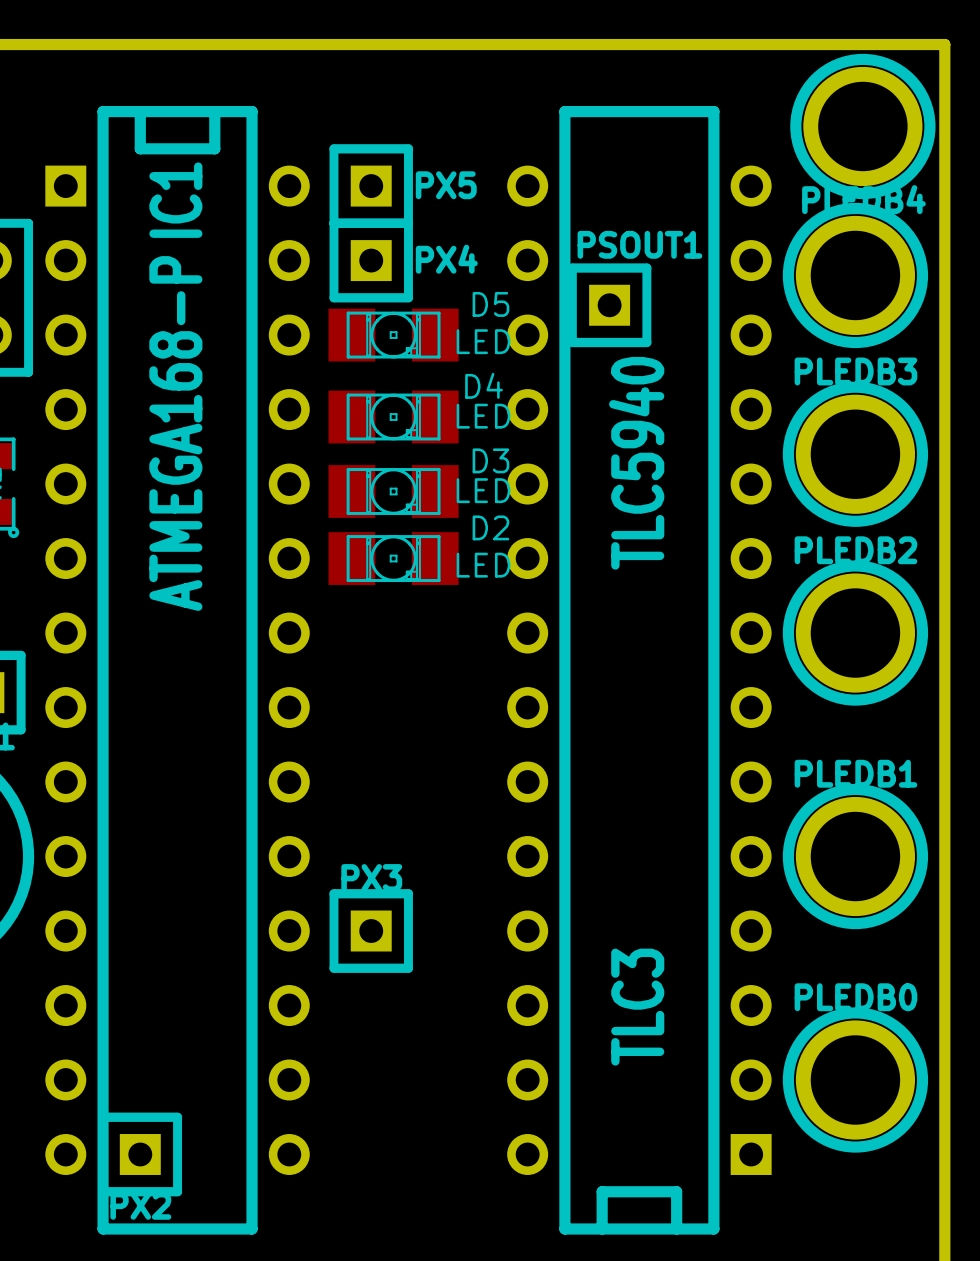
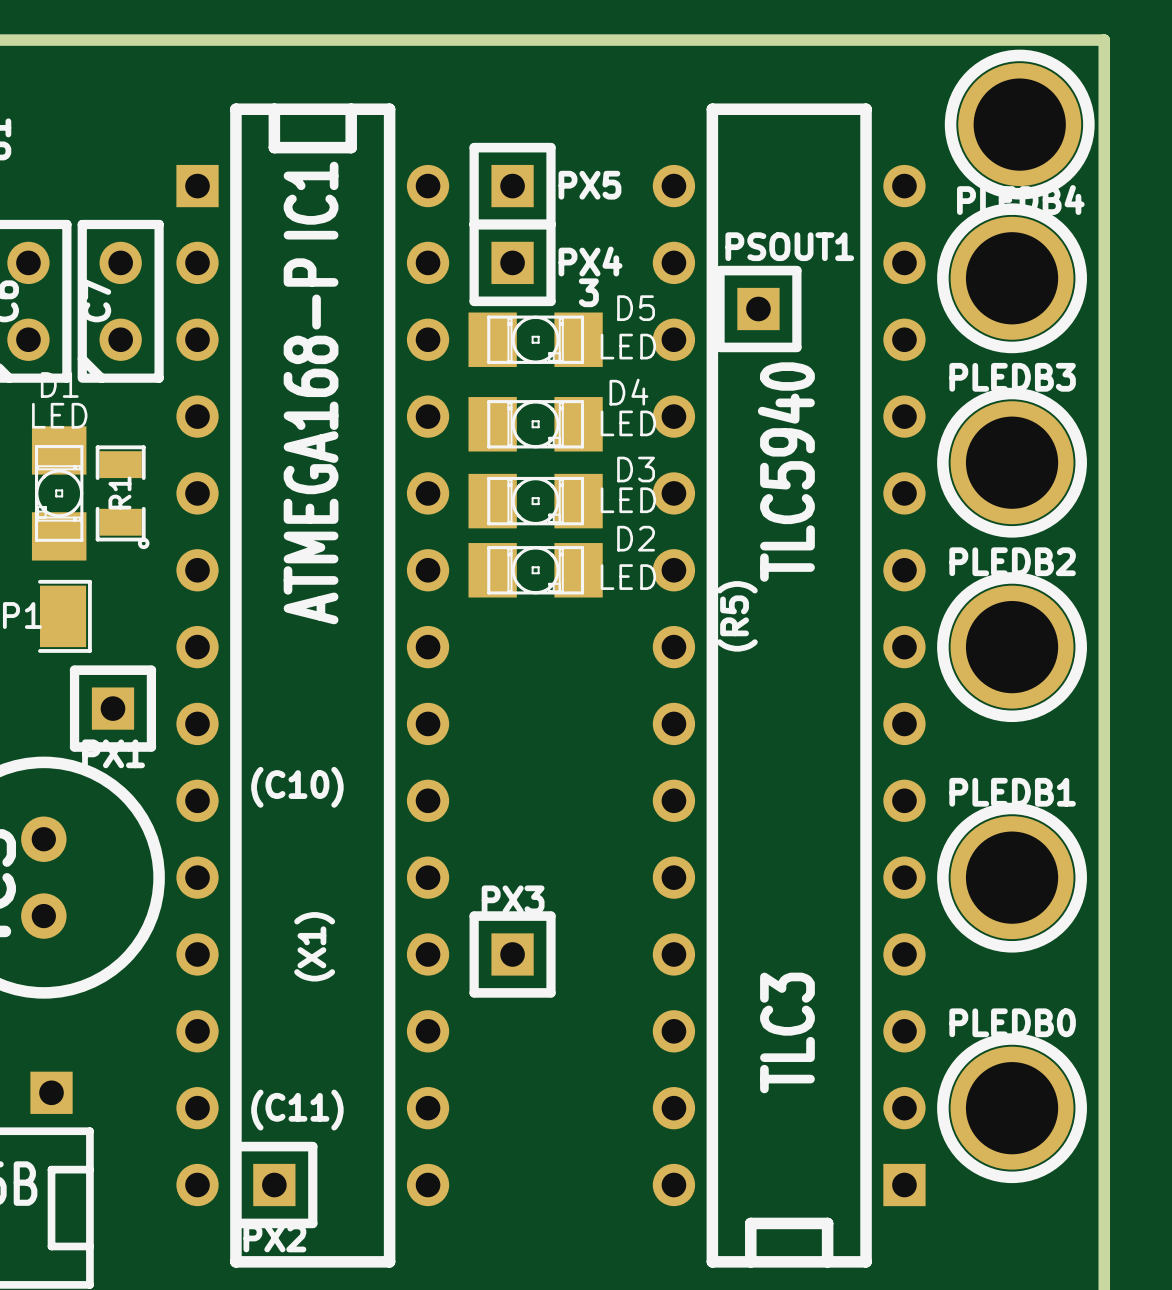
text: none -> 3 (588, 292)
text: none -> (R5) (737, 616)
text: none -> (C10) (297, 787)
text: none -> (X1) (314, 946)
text: none -> (C11) (297, 1110)

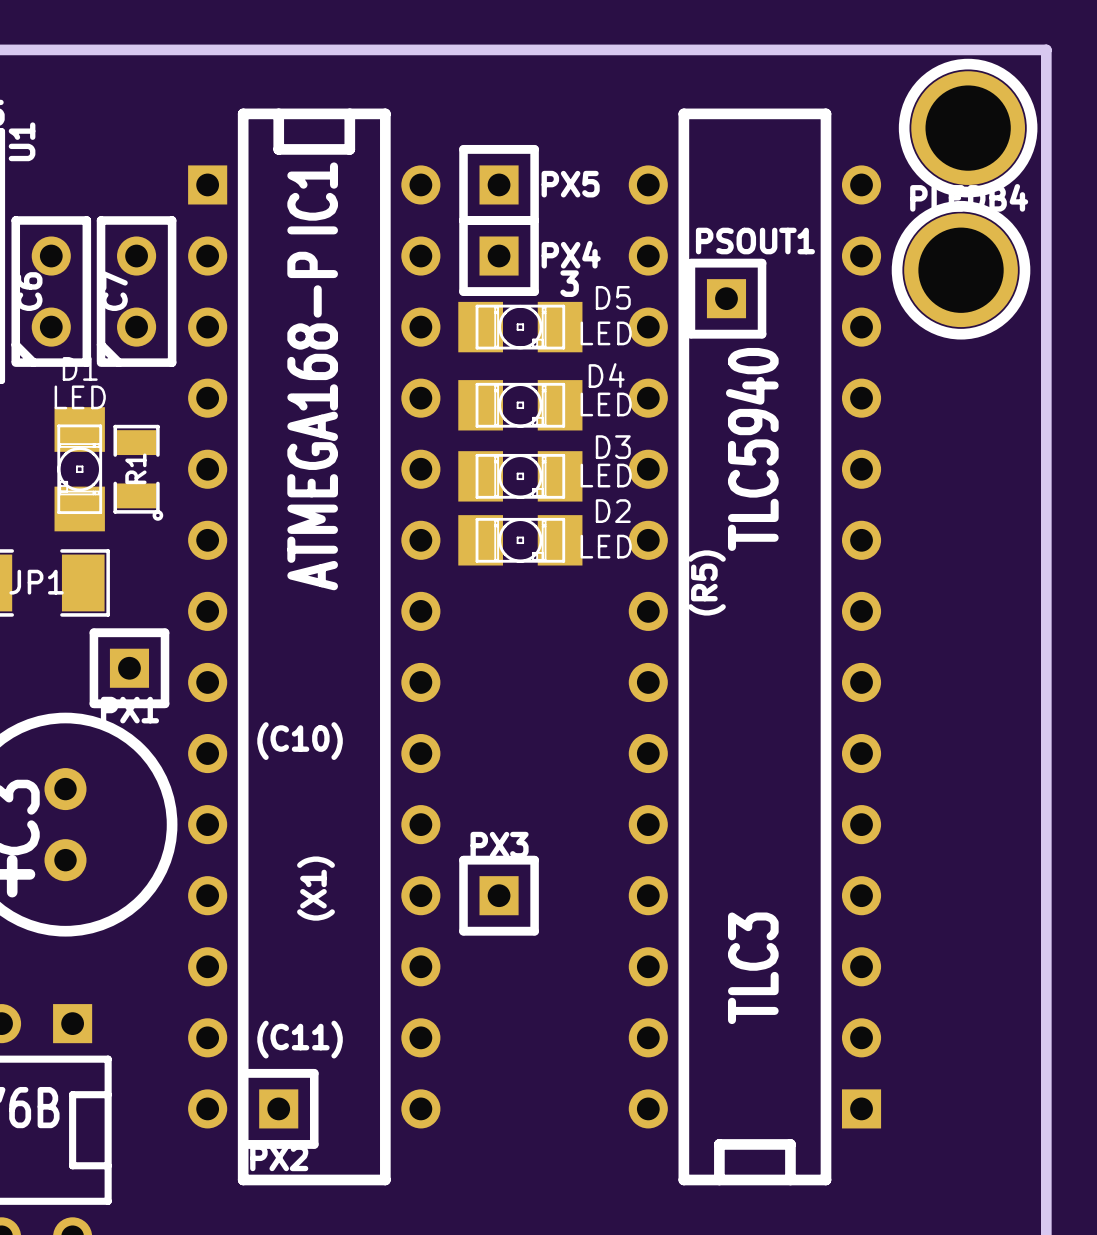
PLEDB3: (1012, 462) -> none
PLEDB2: (1012, 647) -> none
PLEDB1: (1012, 877) -> none
PLEDB0: (1012, 1108) -> none

